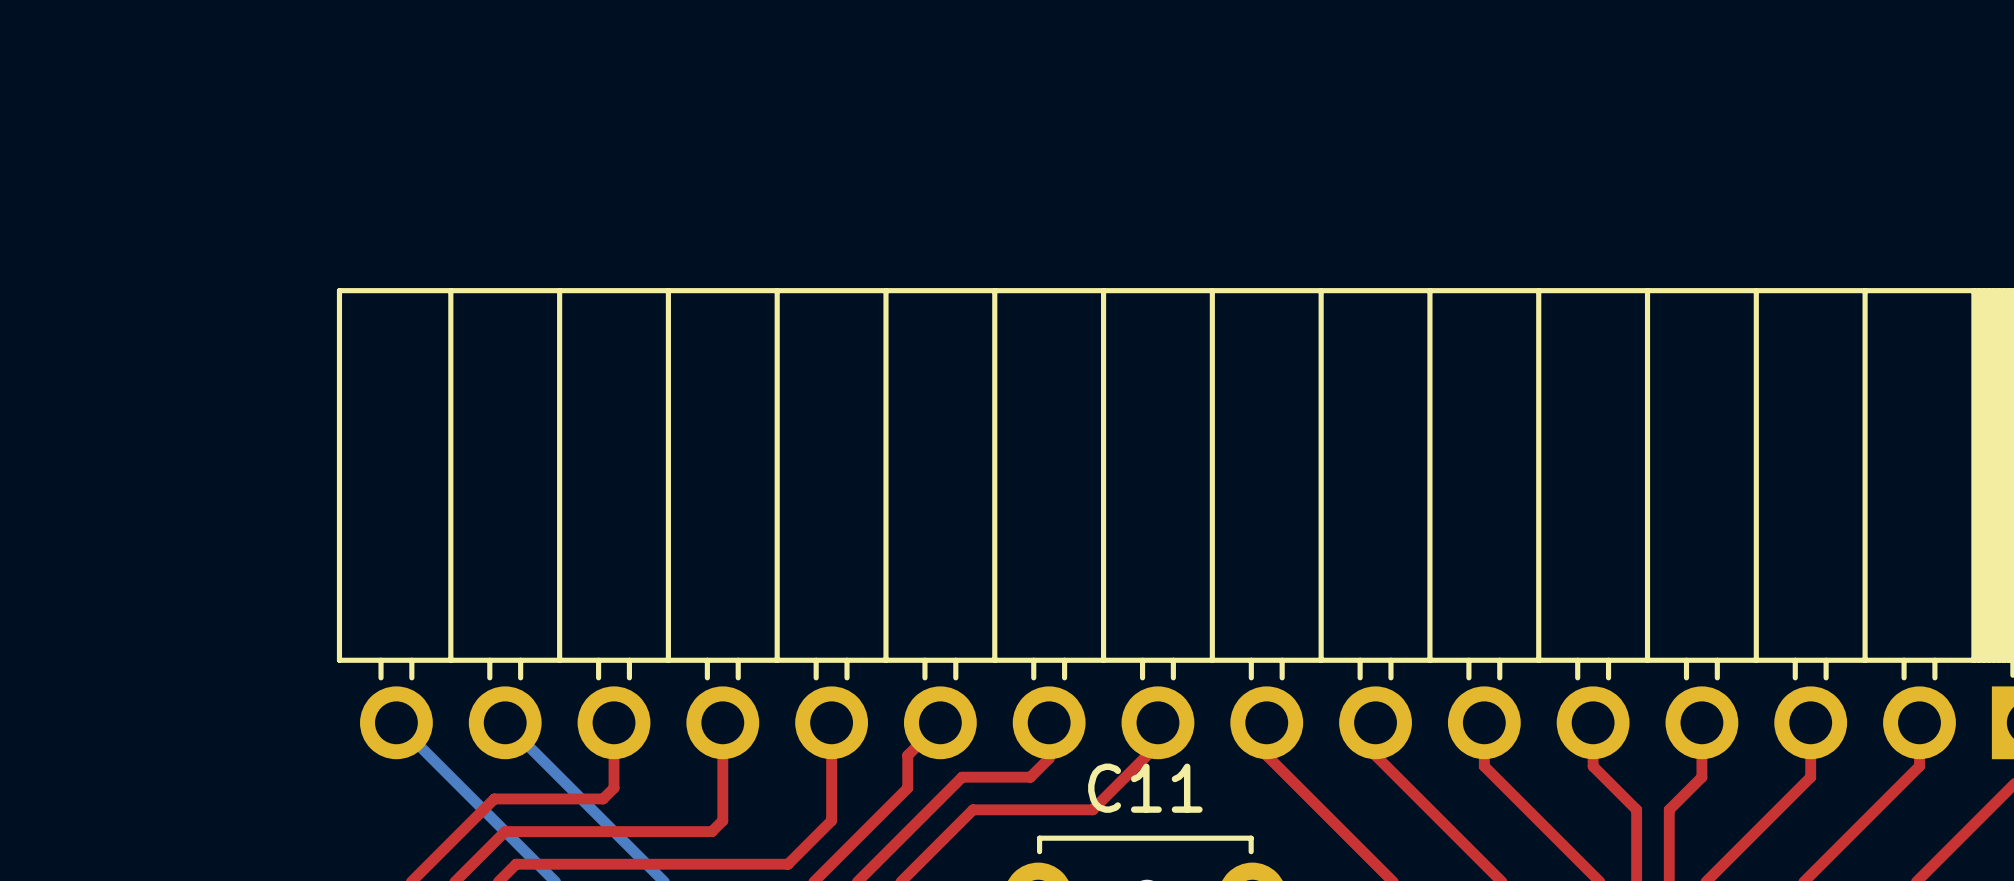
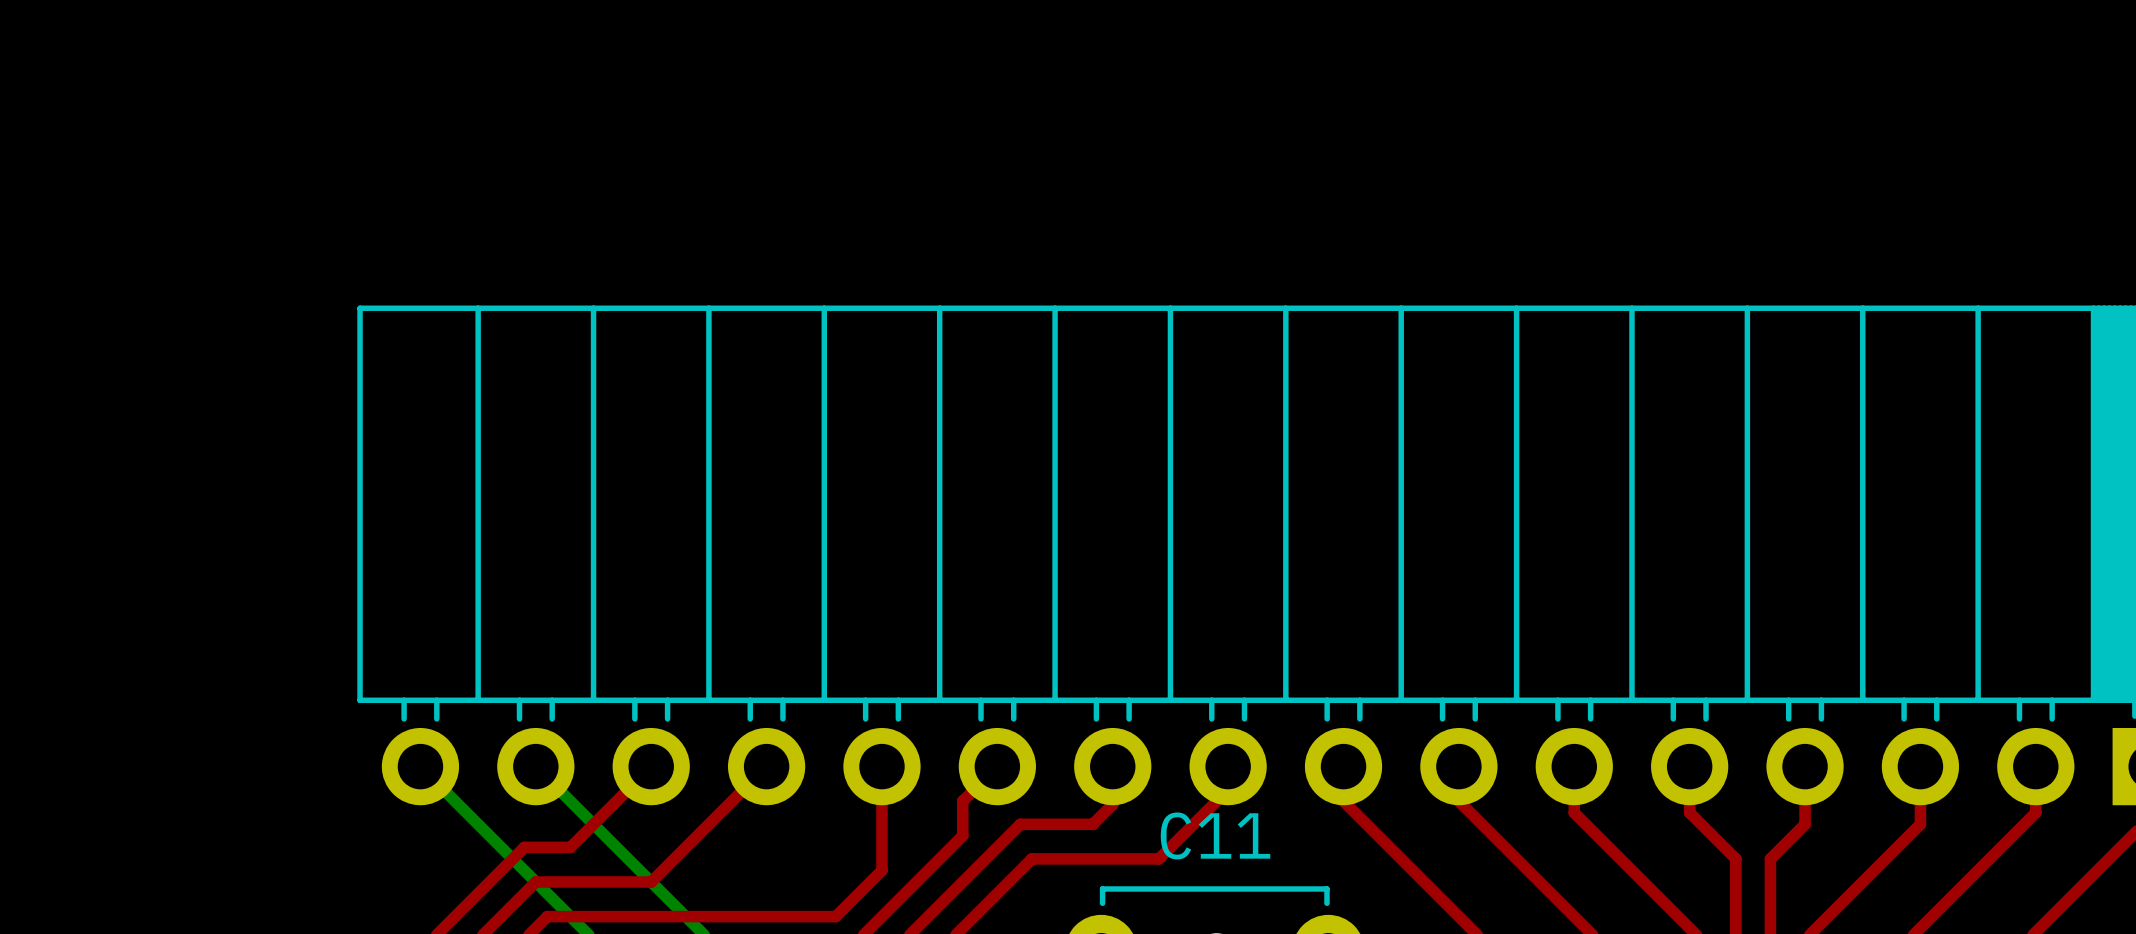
top track: (614, 722) (614, 788) (603, 798) (537, 798) -> (651, 766) (570, 847)
top track: (722, 722) (722, 820) (711, 831) (614, 831) -> (766, 766) (651, 881)

